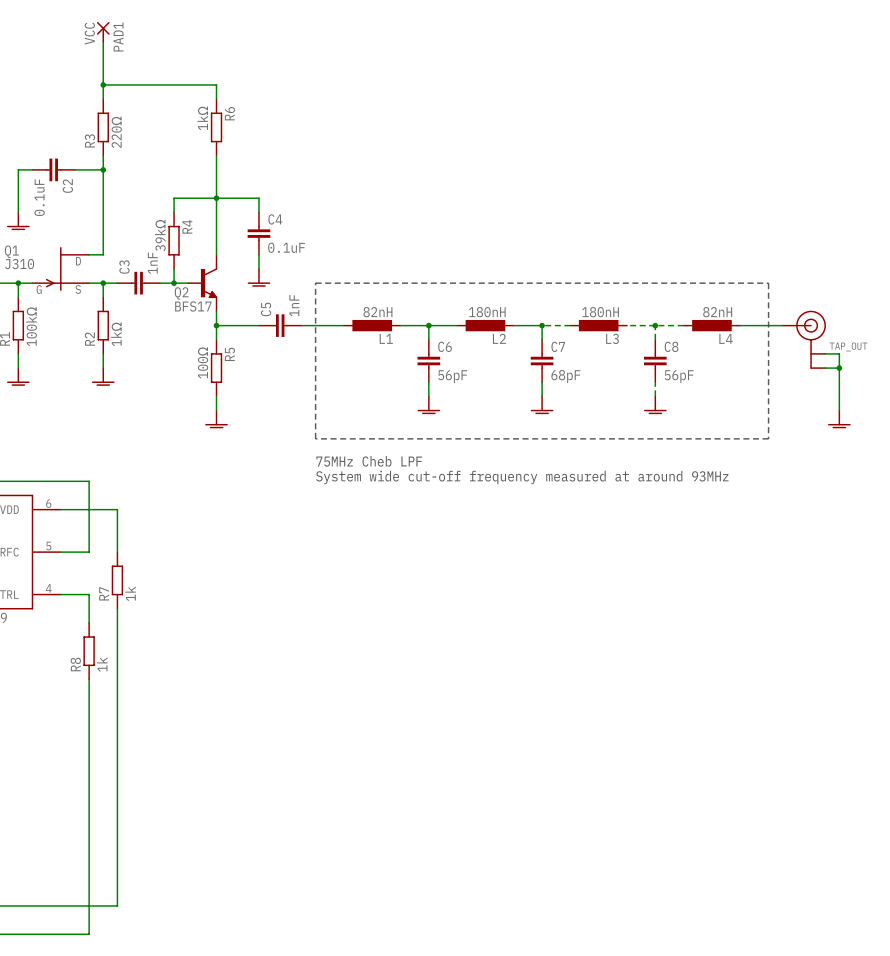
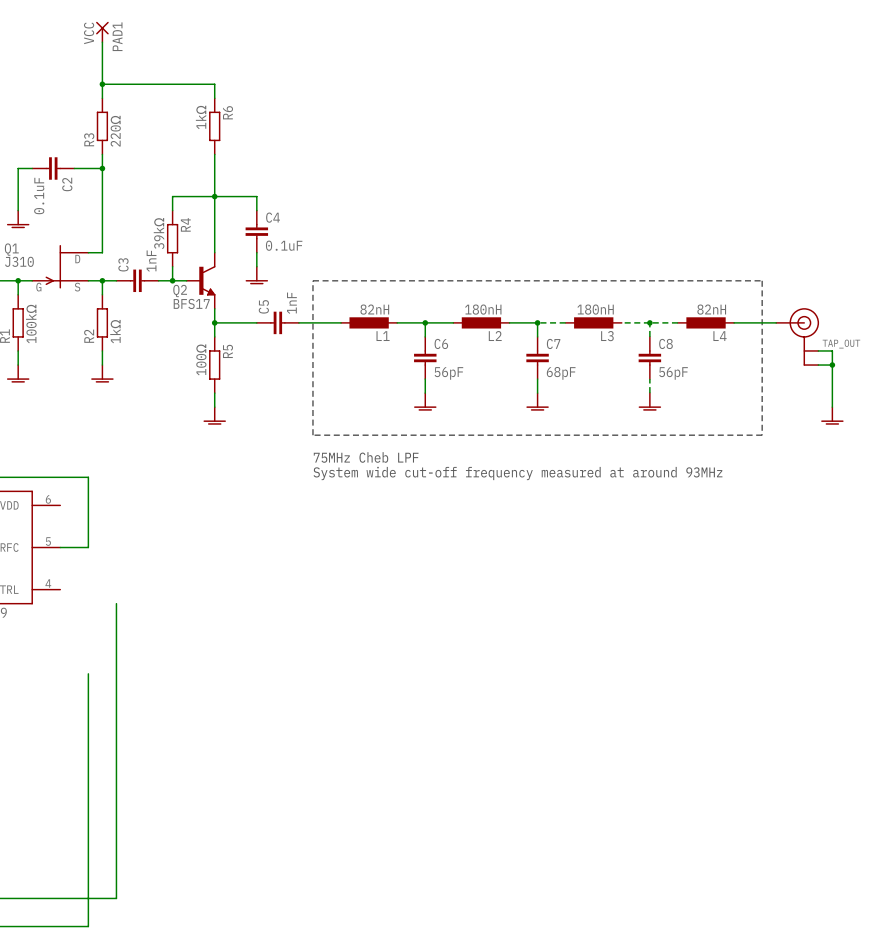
wire: (60, 509) (117, 509) (117, 552) -> none
R7: 1k (117, 580) -> none
wire: (60, 594) (89, 594) (89, 622) -> none
R8: 1k (89, 651) -> none

